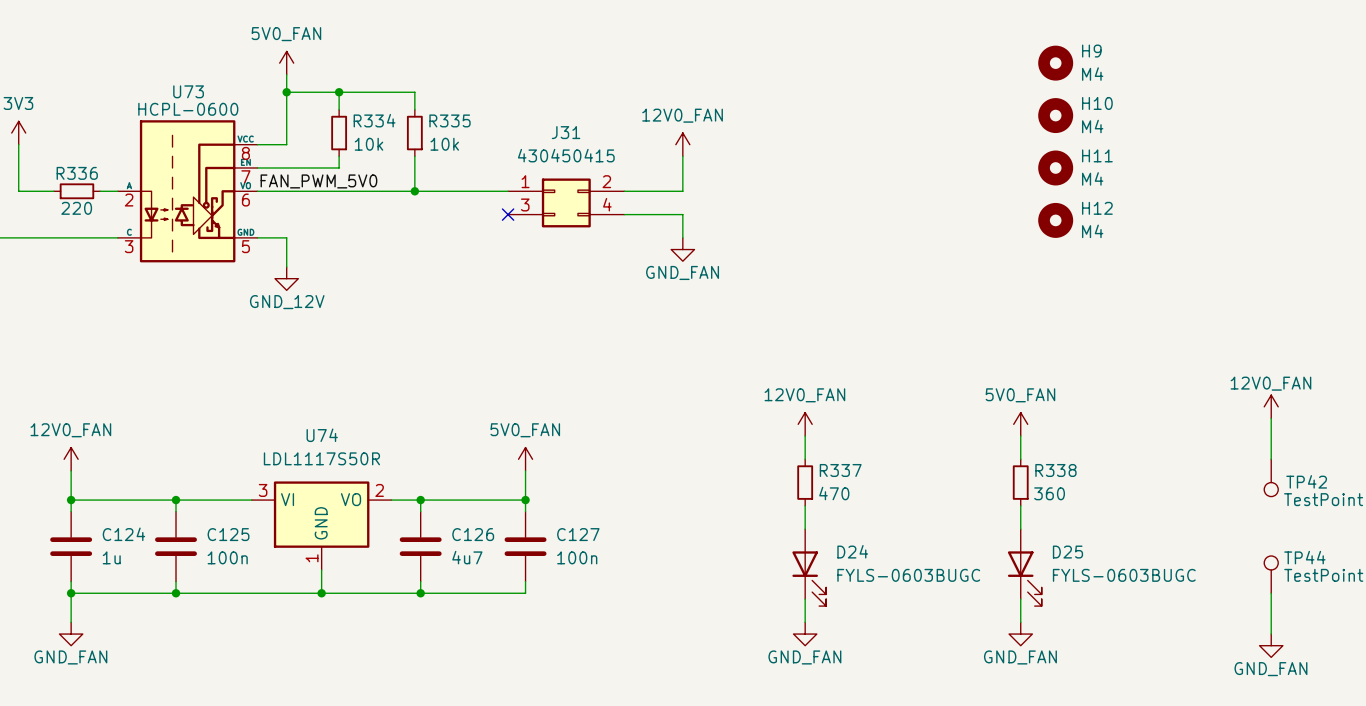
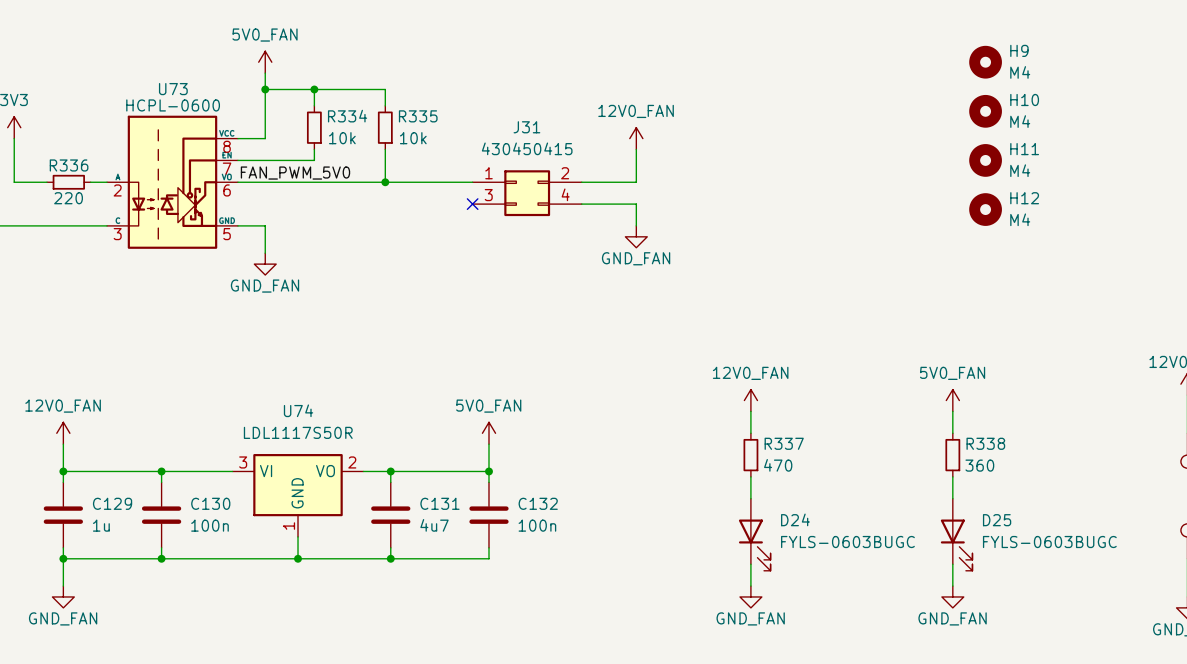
power symbol: GND_12V (286, 278) -> GND_FAN (265, 264)
C124 name: C124 (123, 534) -> C129 (112, 503)
C125 name: C125 (228, 534) -> C130 (210, 503)
C126 name: C126 (473, 534) -> C131 (439, 503)
C127 name: C127 (578, 534) -> C132 (538, 503)

